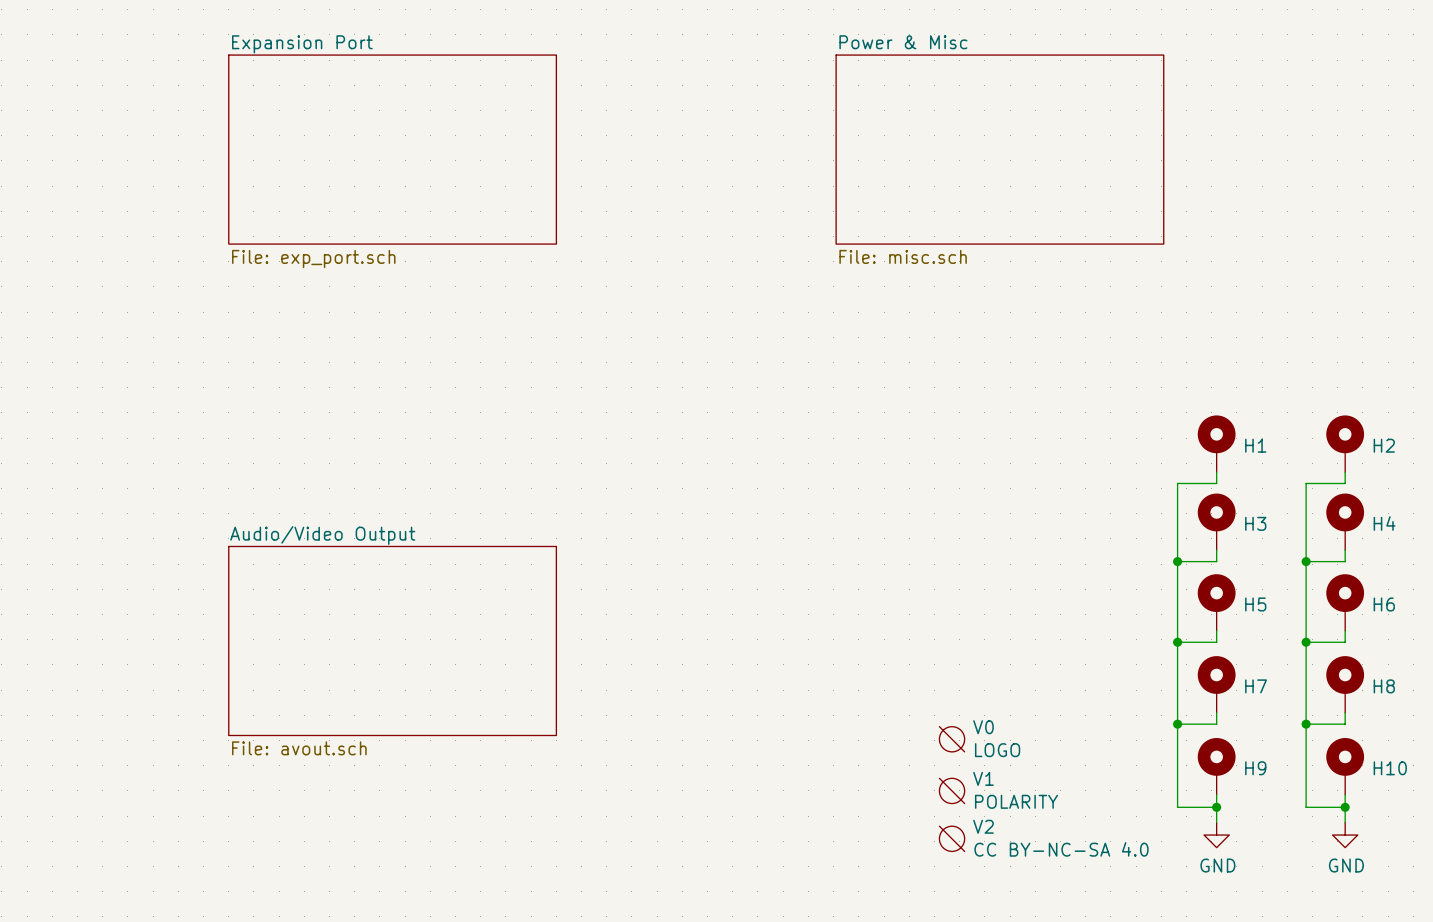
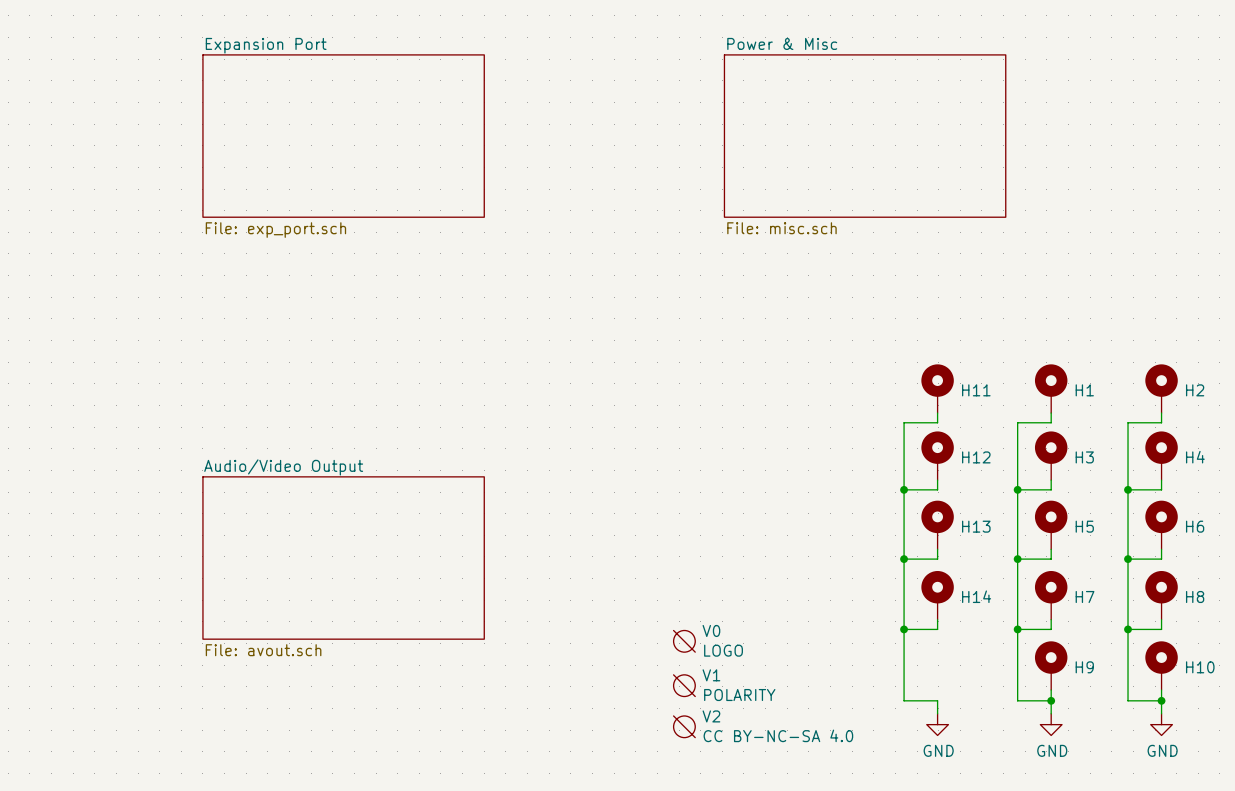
H11: none -> (937, 388)
wire: none -> (937, 413) (937, 422) (904, 422) (904, 700) (937, 700) (937, 713)
H12: none -> (937, 455)
wire: none -> (937, 480) (937, 489) (904, 489)
junction: none -> (904, 489)
H13: none -> (937, 525)
wire: none -> (937, 549) (937, 559) (904, 559)
junction: none -> (904, 559)
H14: none -> (937, 595)
wire: none -> (937, 619) (937, 629) (904, 629)
junction: none -> (904, 629)
V0 position: (952, 739) -> (684, 641)
V1 position: (952, 790) -> (684, 685)
power symbol: none -> GND (937, 724)
V2 position: (952, 838) -> (684, 726)

